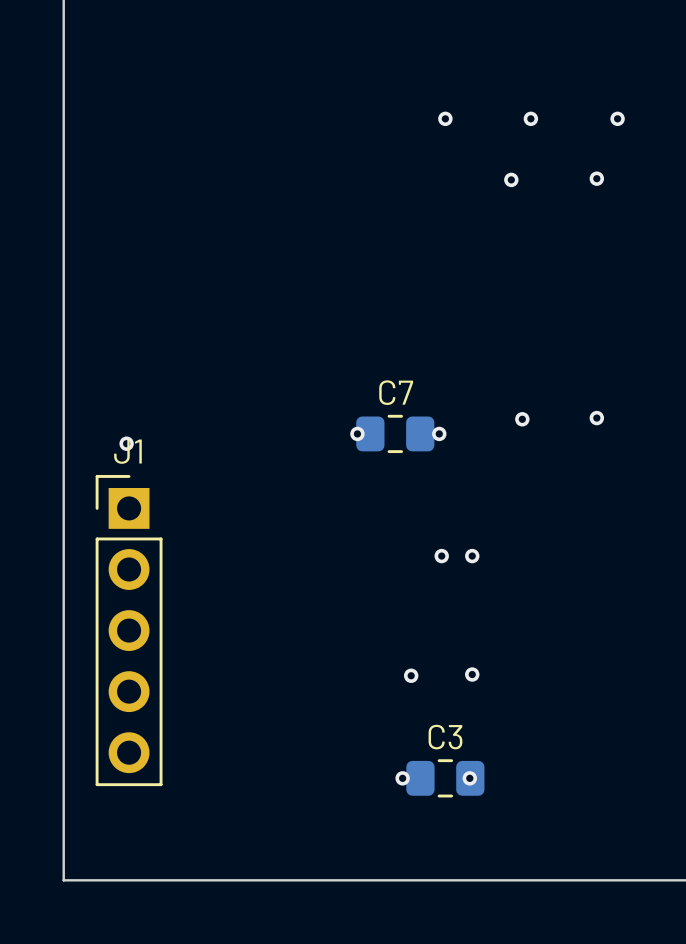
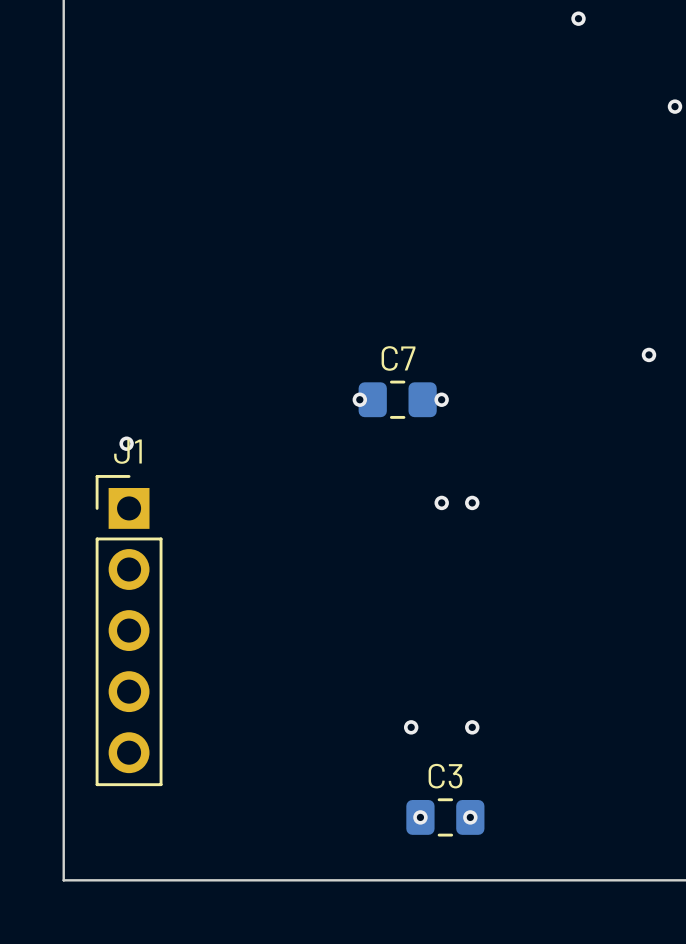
via: none -> (578, 18)
via: none -> (674, 106)
via: (445, 118) -> none
via: (530, 118) -> none
via: (617, 118) -> none
via: (596, 178) -> none
via: (511, 179) -> none
via: none -> (649, 354)
via: (596, 418) -> none
via: (522, 419) -> none
via position: (357, 433) -> (359, 399)
C7 position: (395, 433) -> (397, 399)
via position: (439, 433) -> (441, 399)
via: none -> (441, 502)
via: none -> (472, 502)
via: (441, 556) -> none
via: (472, 556) -> none
via: (472, 674) -> none
via: (411, 675) -> none
via: none -> (411, 727)
via: none -> (472, 727)
via: (402, 778) -> none
C3 position: (445, 778) -> (445, 817)
via: (469, 778) -> none
via: none -> (420, 817)
via: none -> (470, 817)

